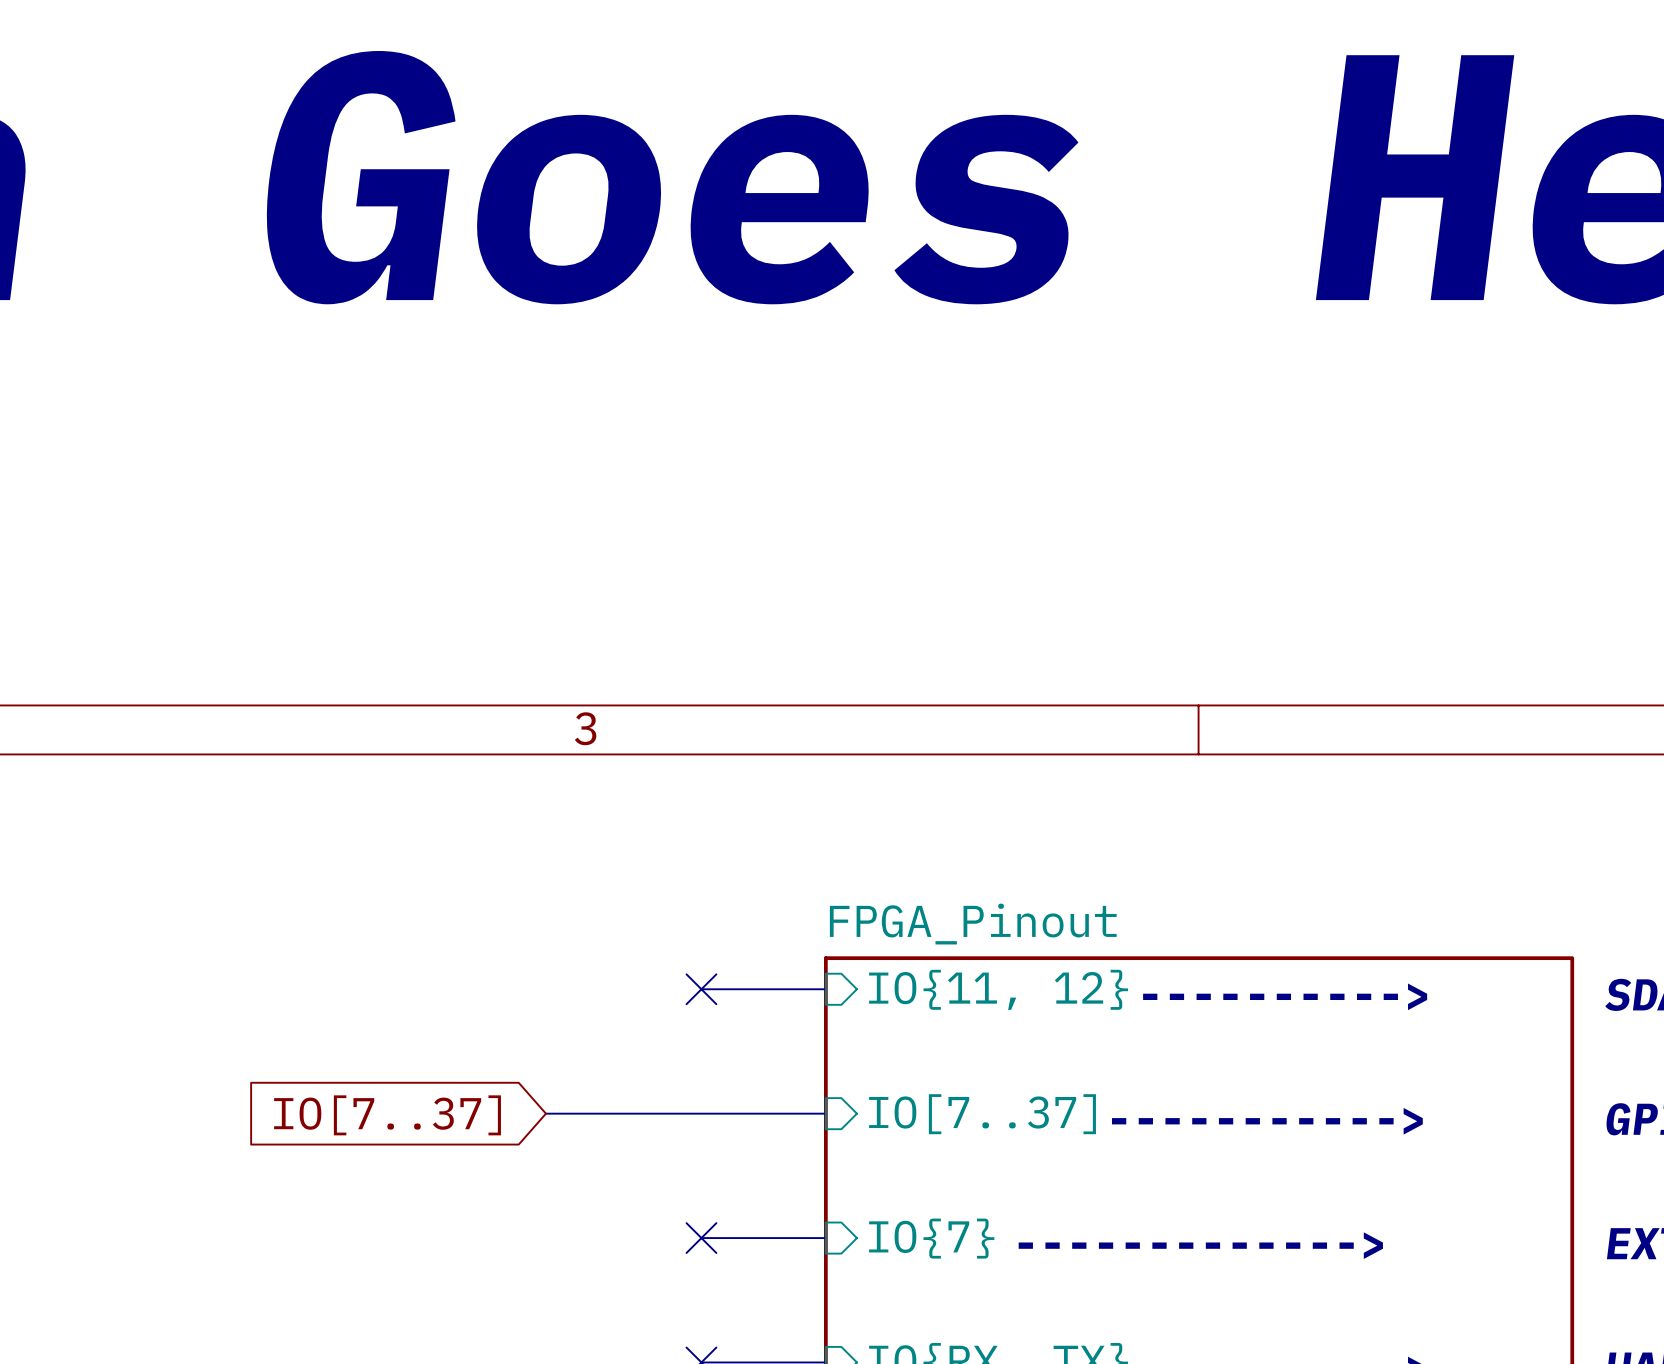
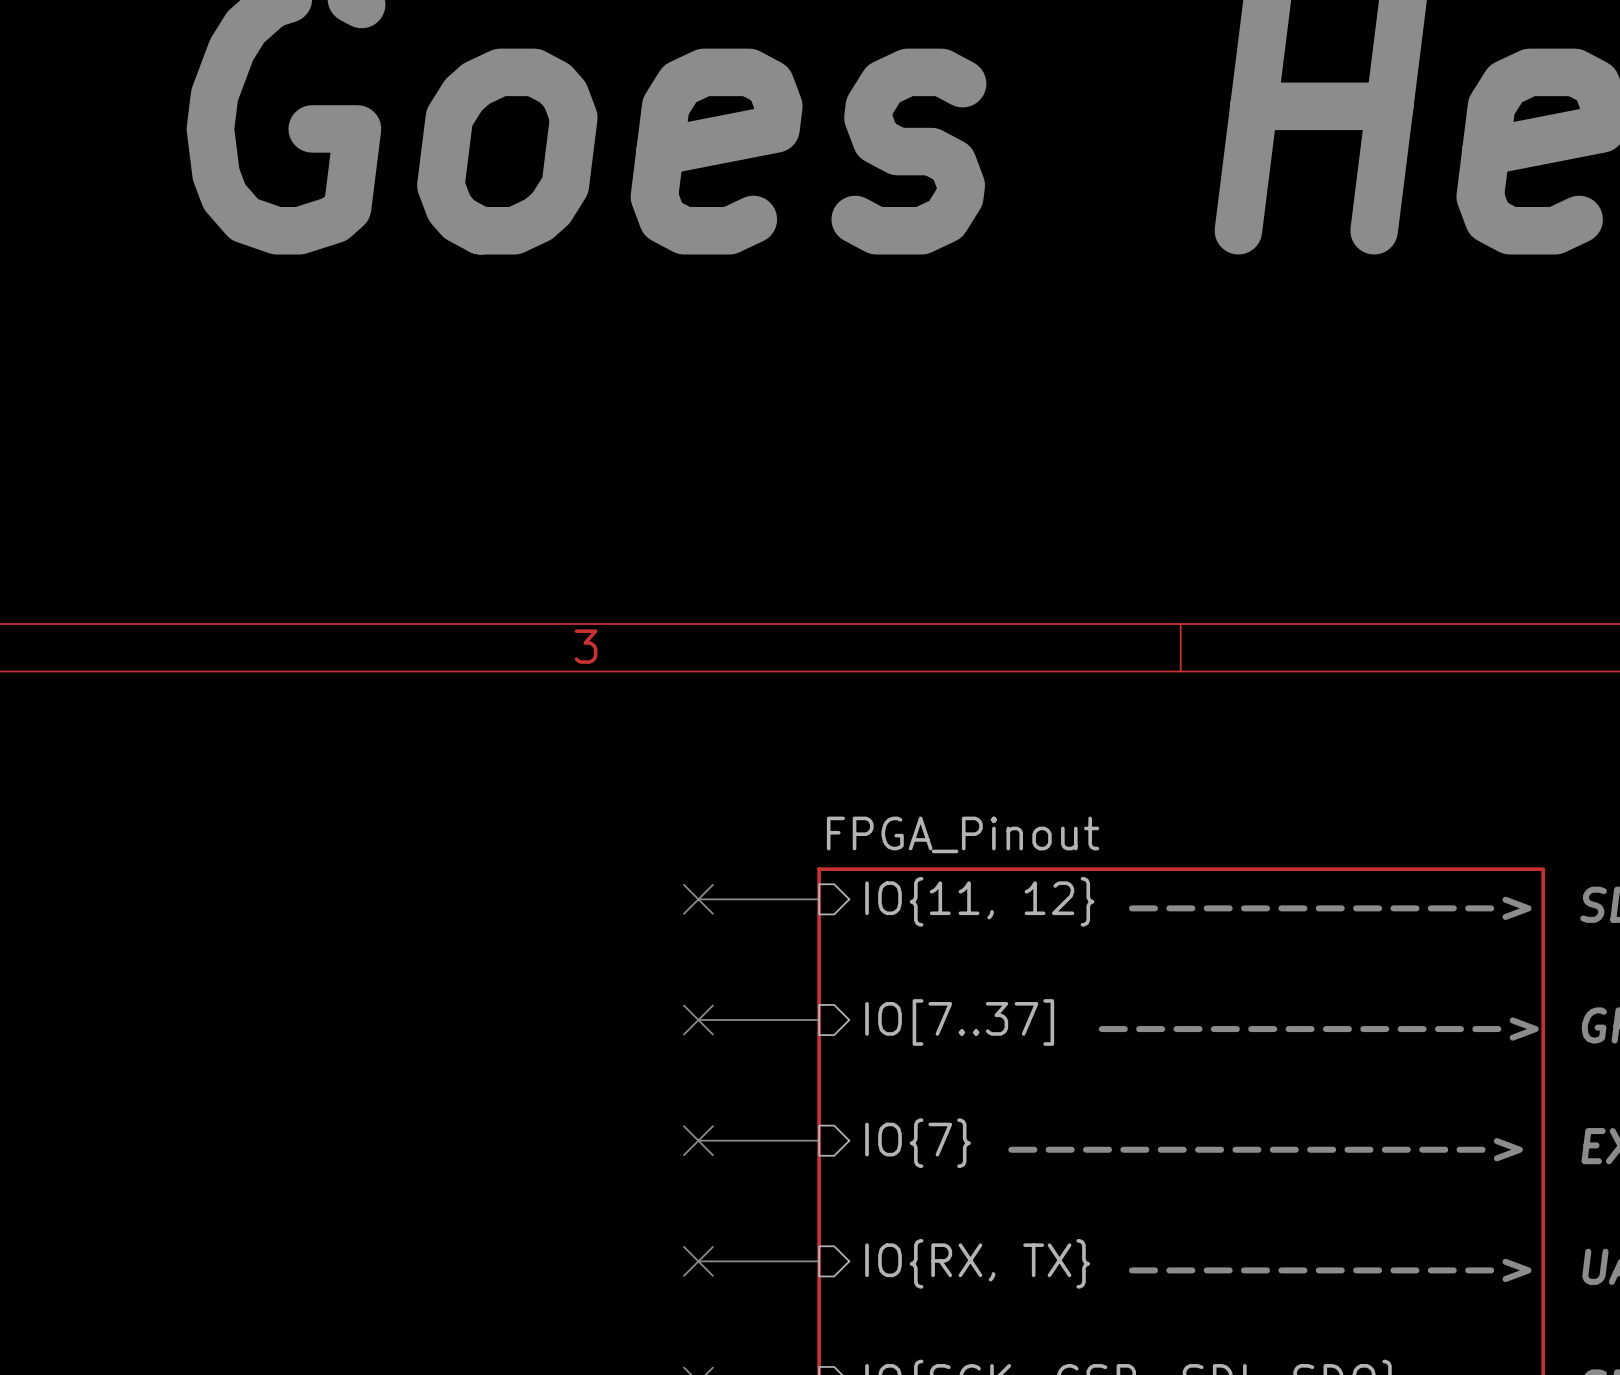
bus: (545, 1113) (701, 1113) -> none
no-connect mark: none -> (698, 1020)
global label: IO[7..37] (387, 1115) -> none

